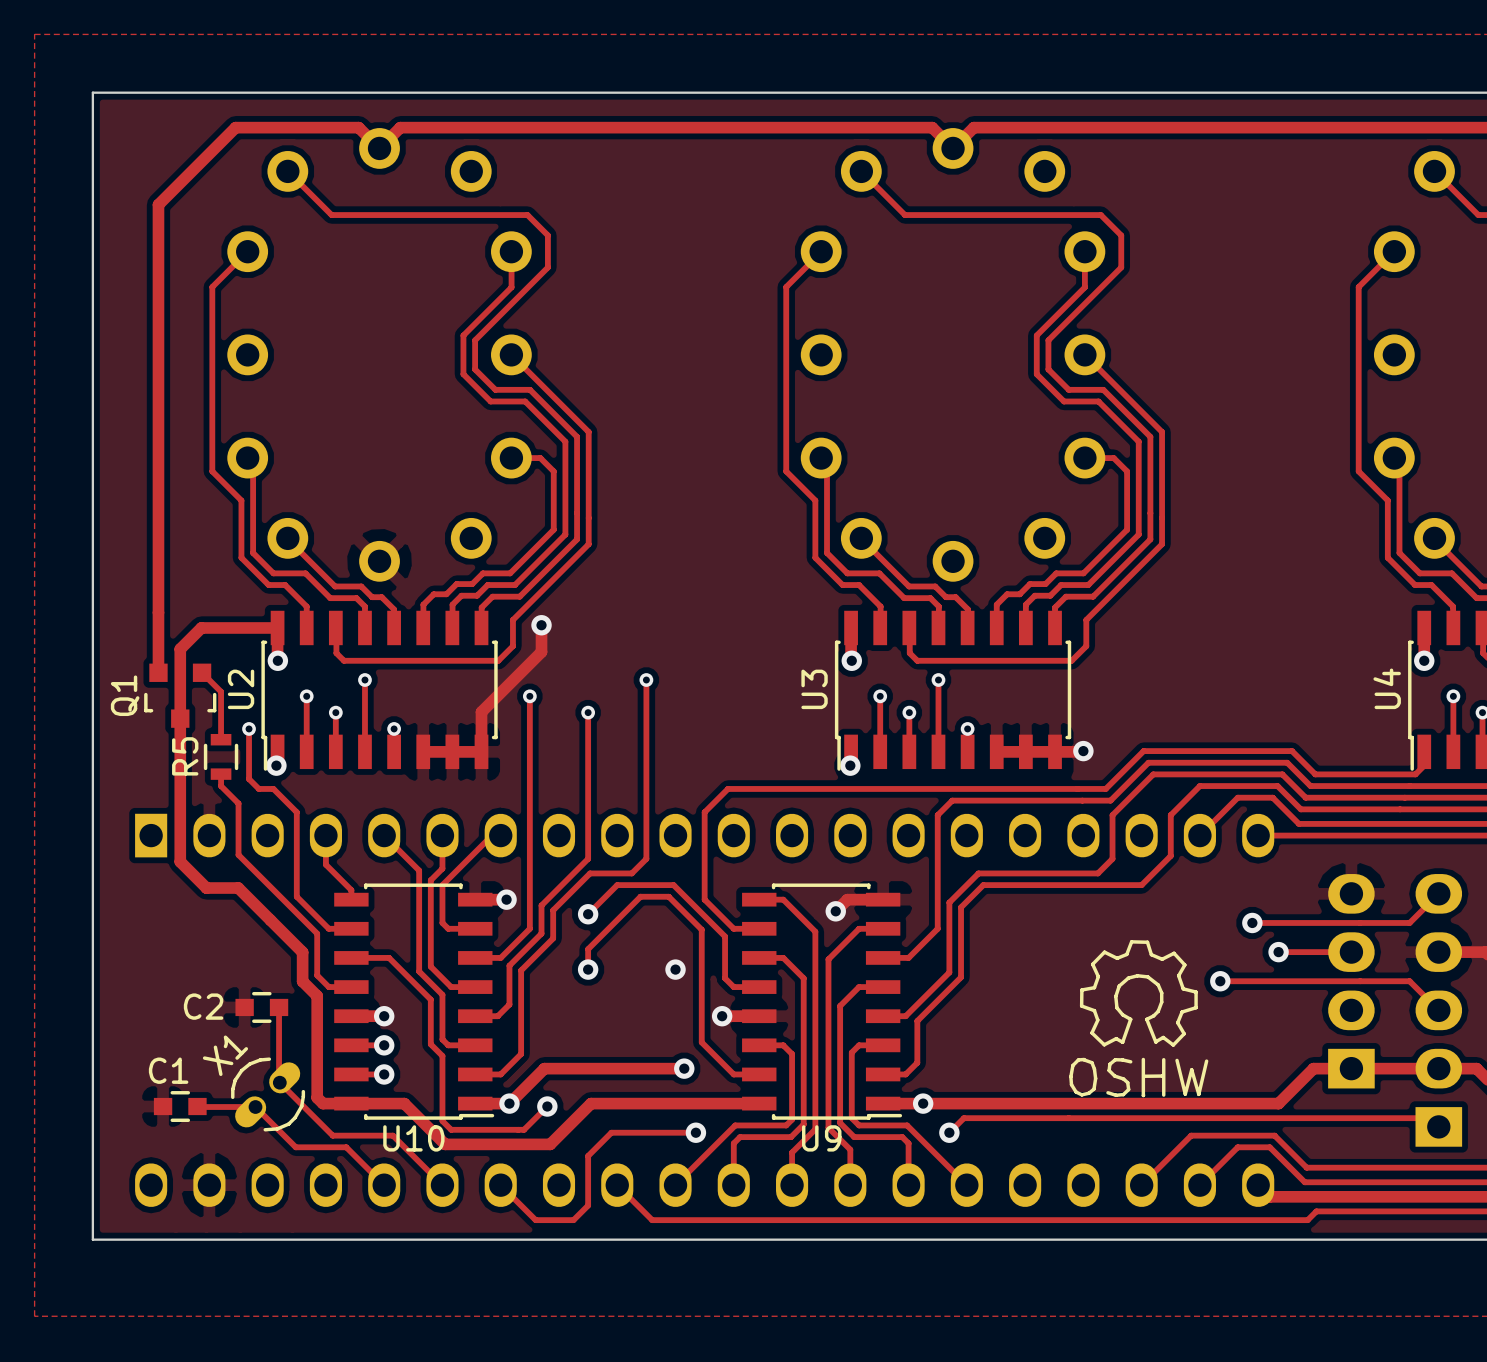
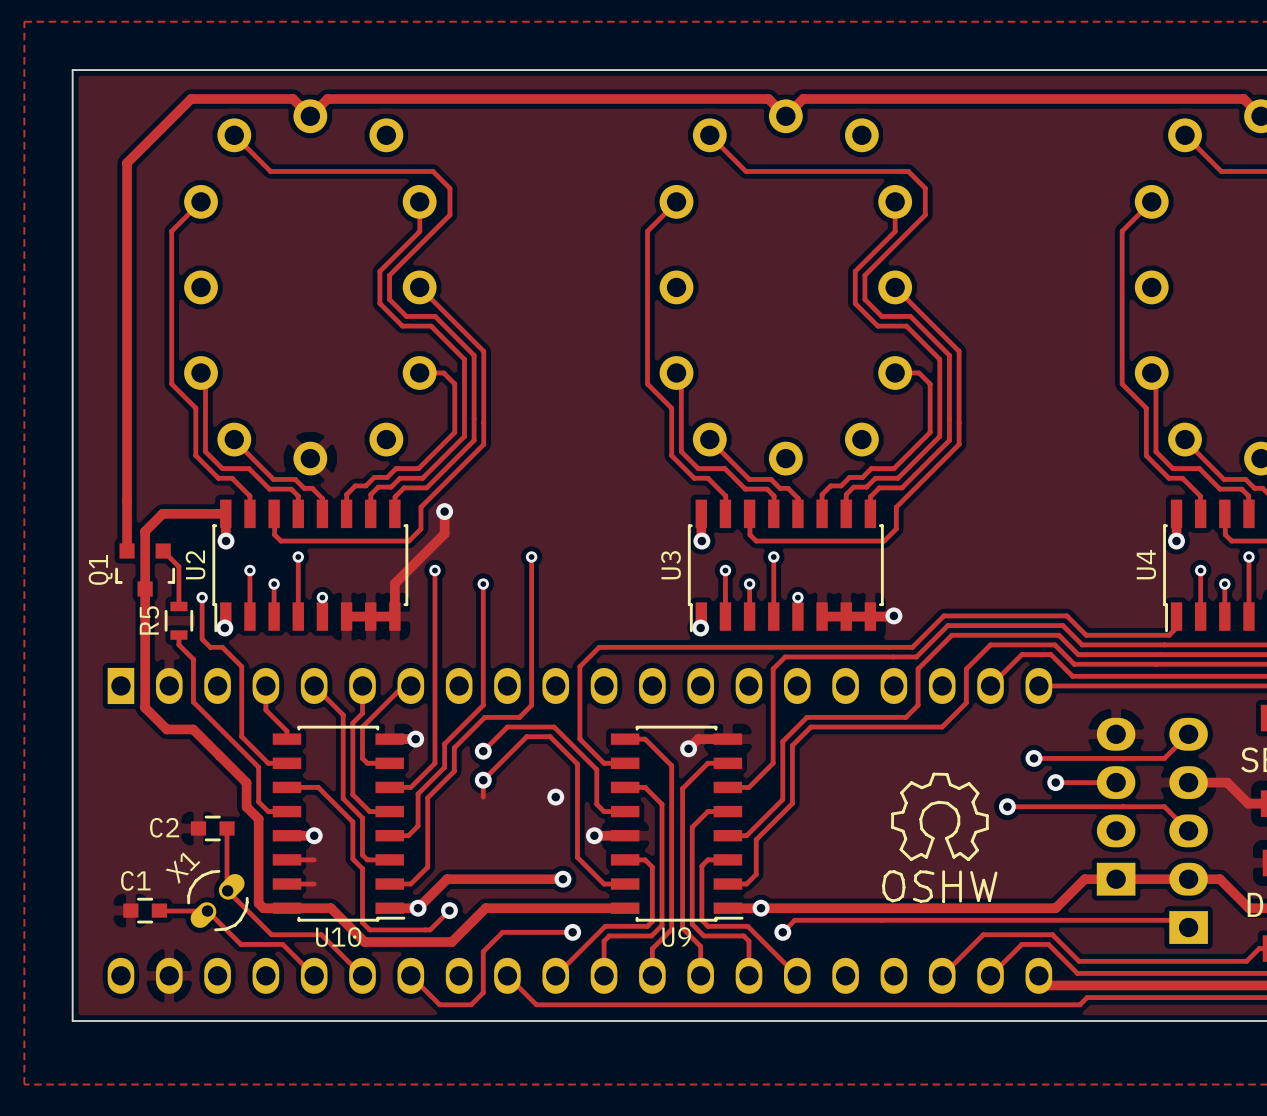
via position: (588, 969) -> (483, 780)
via: (384, 1045) -> none
via: (384, 1074) -> none

